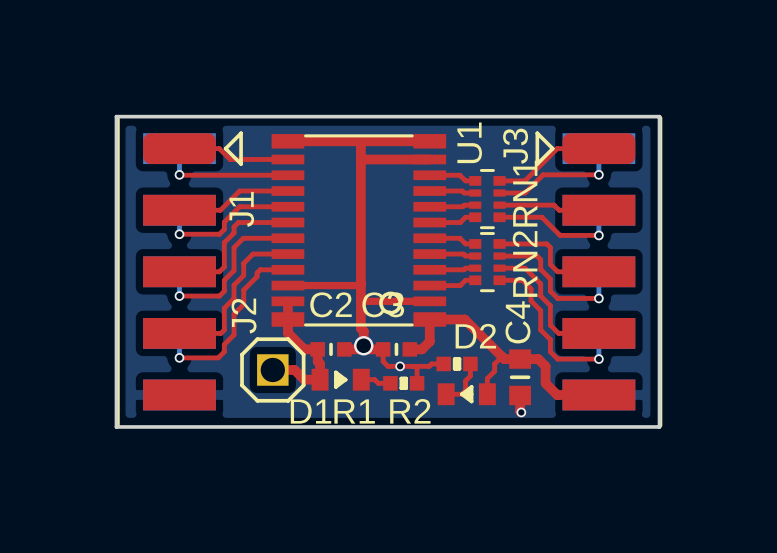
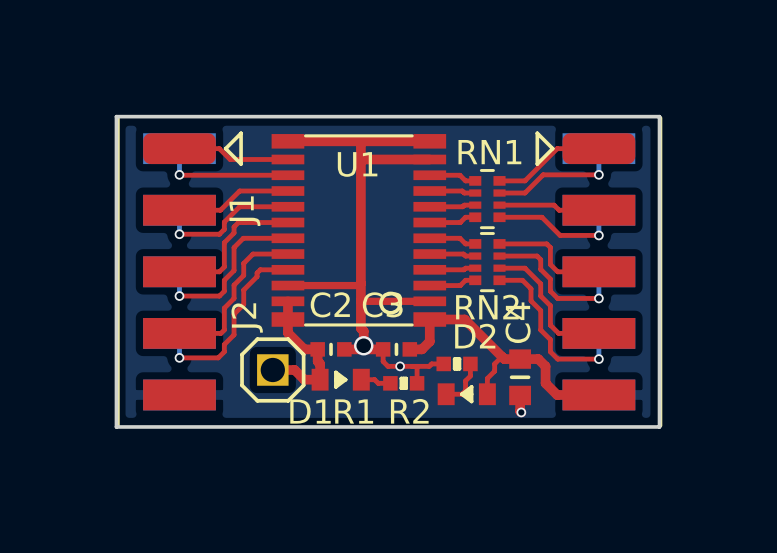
U1 name rotation: 0° (469, 142) -> 90° clockwise (357, 164)
U1 name position: U1 (469, 142) -> U1 (357, 164)
J3 name: J3 (515, 146) -> none
RN1 name rotation: 0° (525, 193) -> 90° clockwise (489, 152)
RN2 name rotation: 0° (525, 263) -> 90° clockwise (487, 307)

